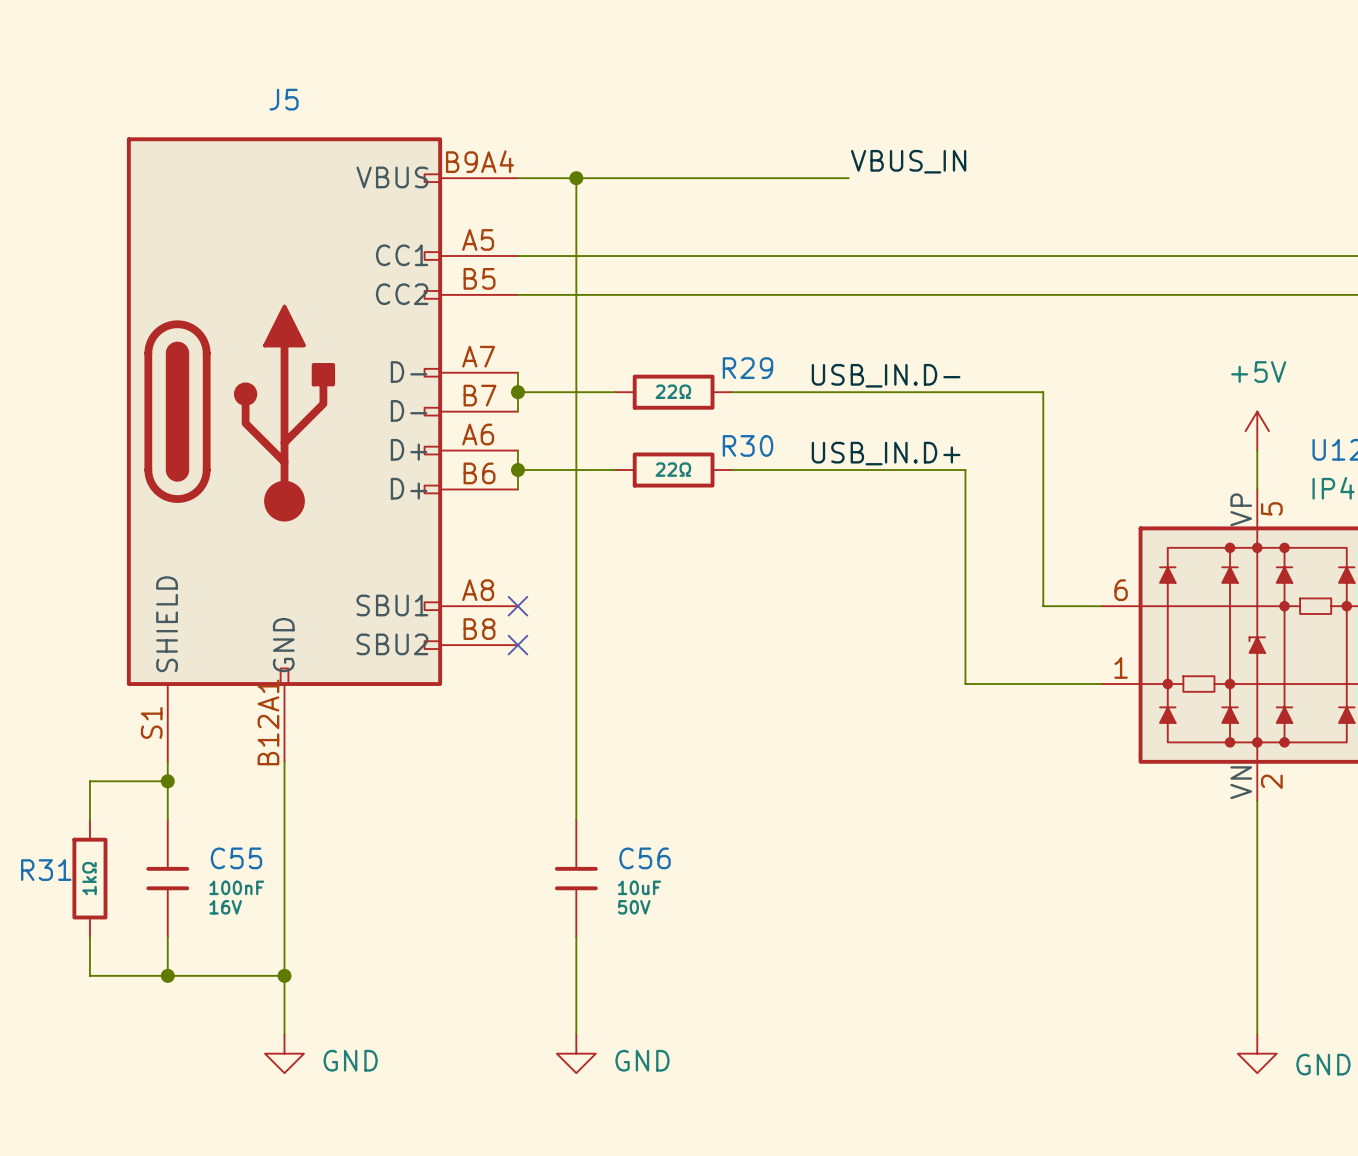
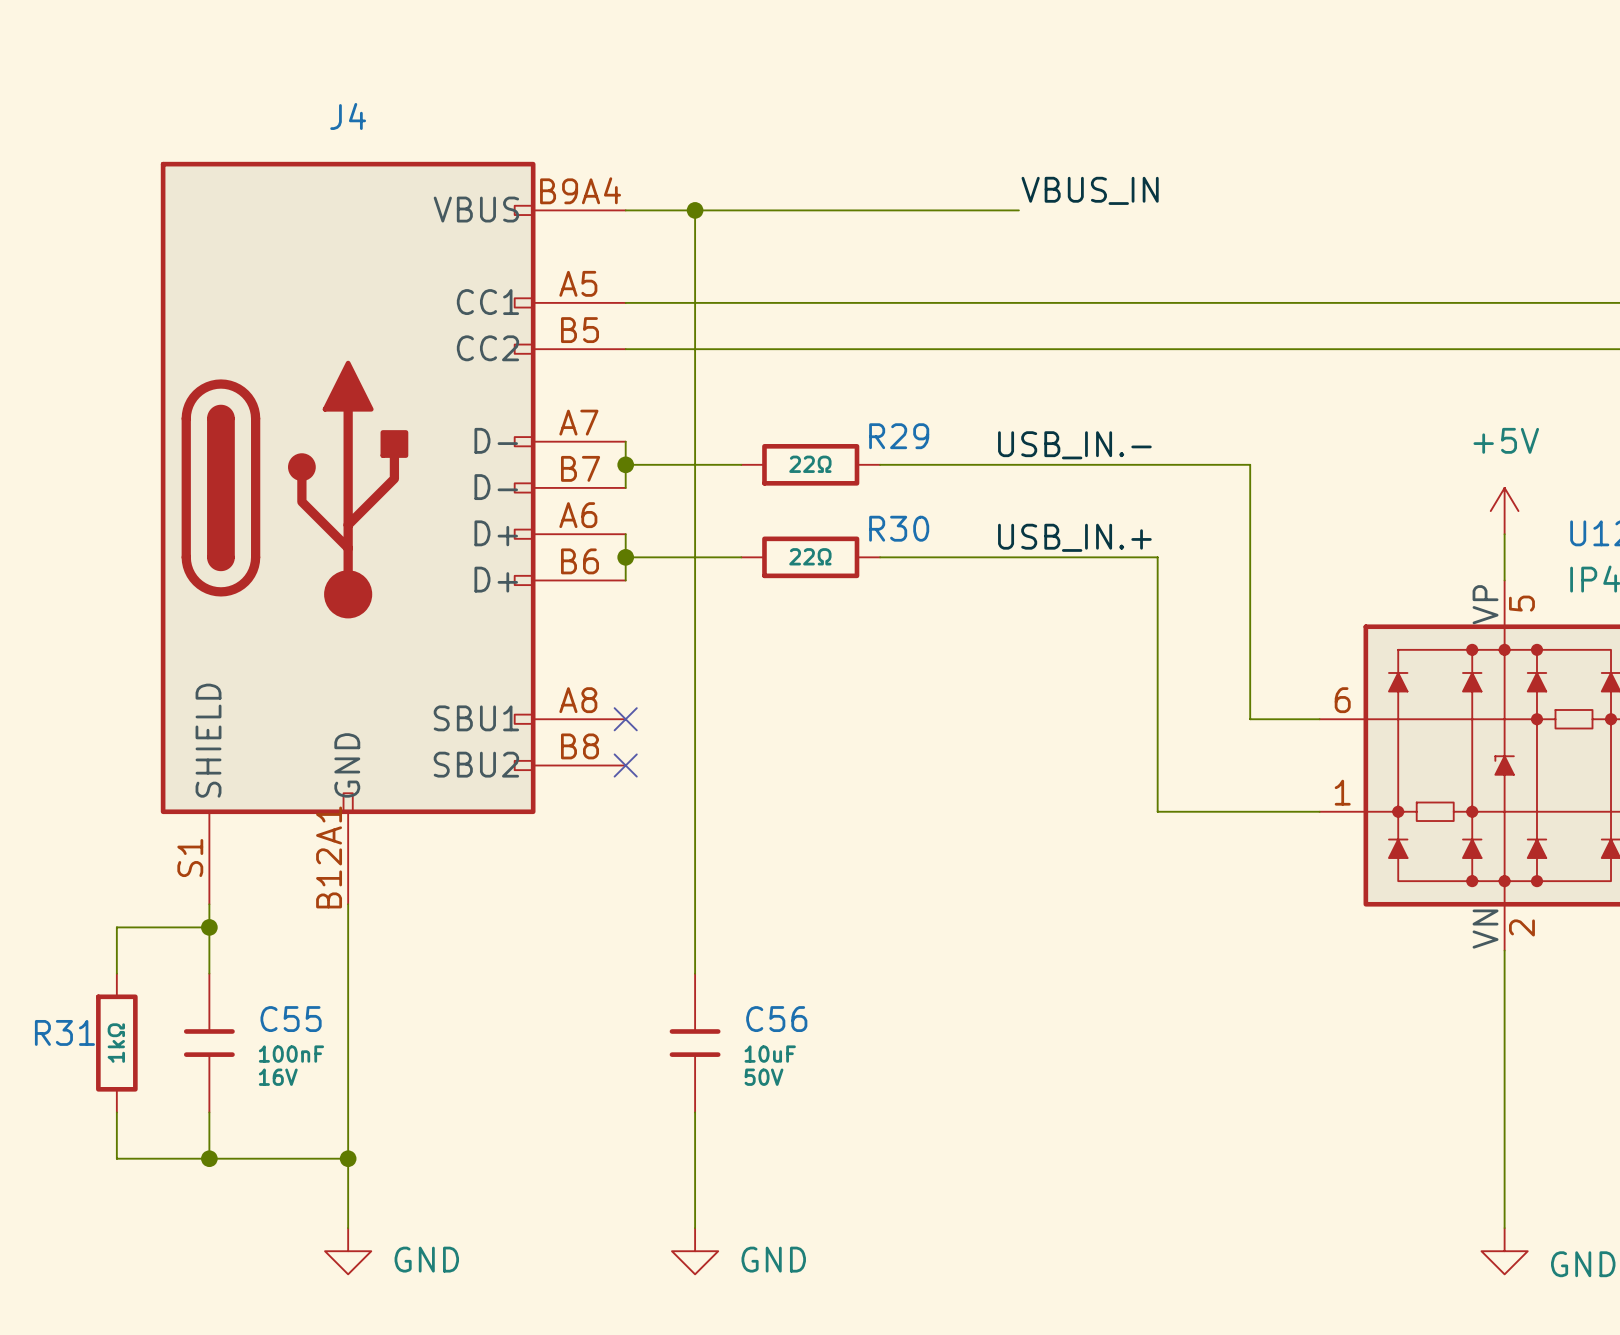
J5 name: J5 (284, 99) -> J4 (348, 116)
label: USB_IN.D- (886, 375) -> USB_IN.- (1074, 445)
label: USB_IN.D+ (886, 453) -> USB_IN.+ (1074, 537)

